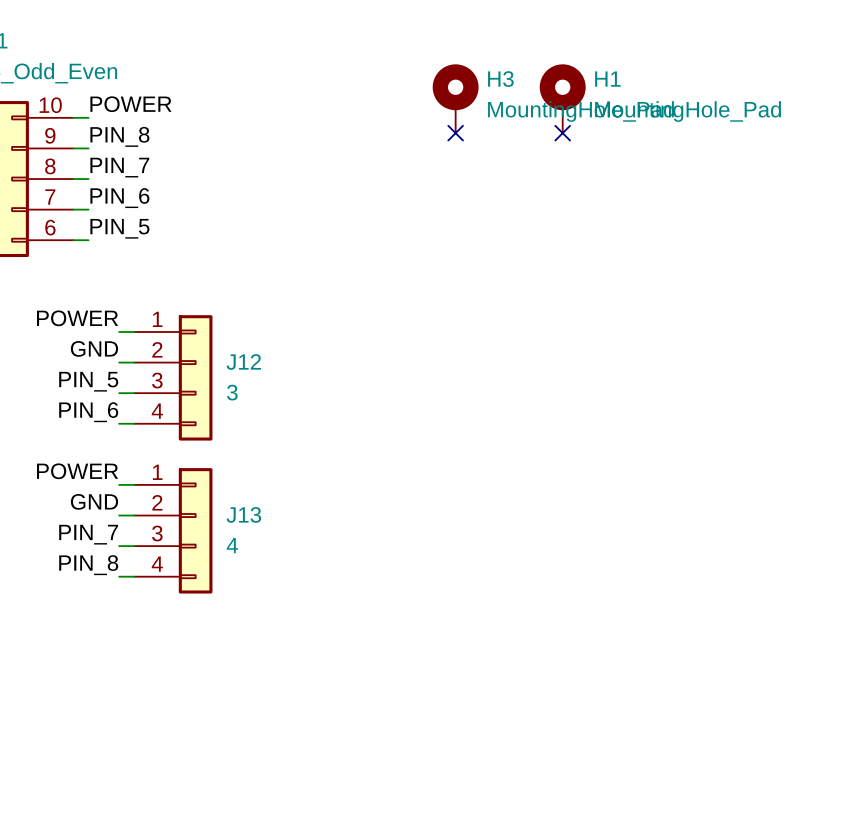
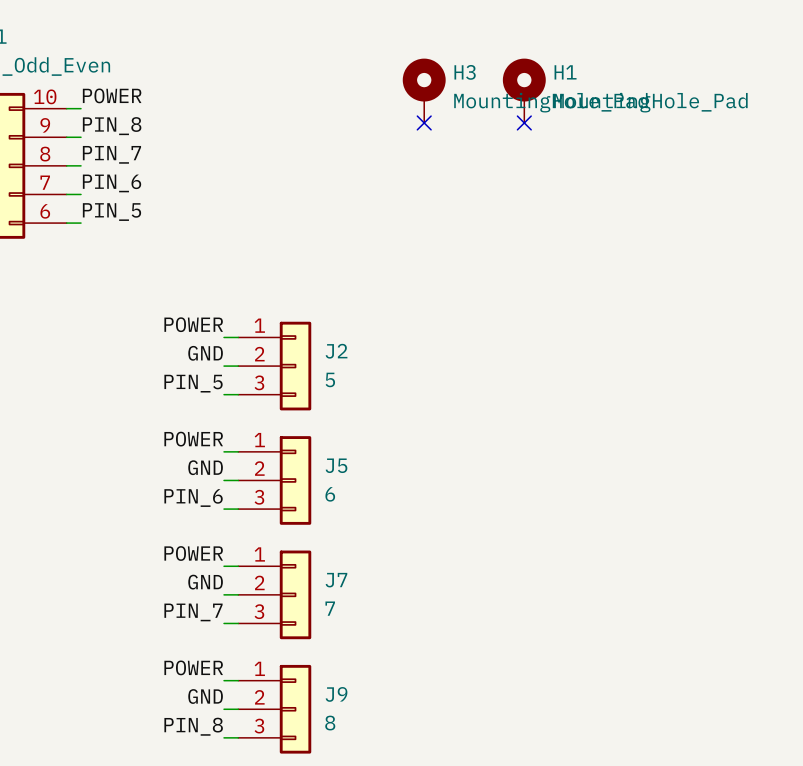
label: POWER (77, 318) -> none
wire: (119, 331) (134, 331) -> none
label: GND (94, 348) -> none
label: none -> POWER (193, 324)
wire: (119, 362) (134, 362) -> (224, 337) (238, 337)
J12: 3 (173, 377) -> none
label: none -> GND (205, 353)
label position: PIN_5 (88, 381) -> PIN_5 (193, 383)
wire: (119, 393) (134, 393) -> (224, 366) (238, 366)
J2: none -> 5 (274, 366)
label position: PIN_6 (88, 412) -> PIN_6 (193, 498)
wire: (119, 423) (134, 423) -> (224, 394) (238, 394)
label: POWER (77, 471) -> none
label: none -> POWER (193, 439)
wire: (119, 484) (134, 484) -> (224, 451) (238, 451)
label: GND (94, 501) -> none
label: none -> GND (205, 467)
wire: (119, 515) (134, 515) -> (224, 480) (238, 480)
J5: none -> 6 (274, 480)
J13: 4 (173, 530) -> none
label position: PIN_7 (88, 534) -> PIN_7 (193, 612)
wire: (119, 546) (134, 546) -> (224, 509) (238, 509)
label position: PIN_8 (88, 565) -> PIN_8 (193, 726)
wire: (119, 576) (134, 576) -> (224, 566) (238, 566)
label: none -> POWER (193, 553)
label: none -> GND (205, 582)
wire: none -> (224, 594) (238, 594)
J7: none -> 7 (274, 594)
wire: none -> (224, 623) (238, 623)
label: none -> POWER (193, 667)
wire: none -> (224, 680) (238, 680)
label: none -> GND (205, 696)
wire: none -> (224, 709) (238, 709)
J9: none -> 8 (274, 709)
wire: none -> (224, 737) (238, 737)

